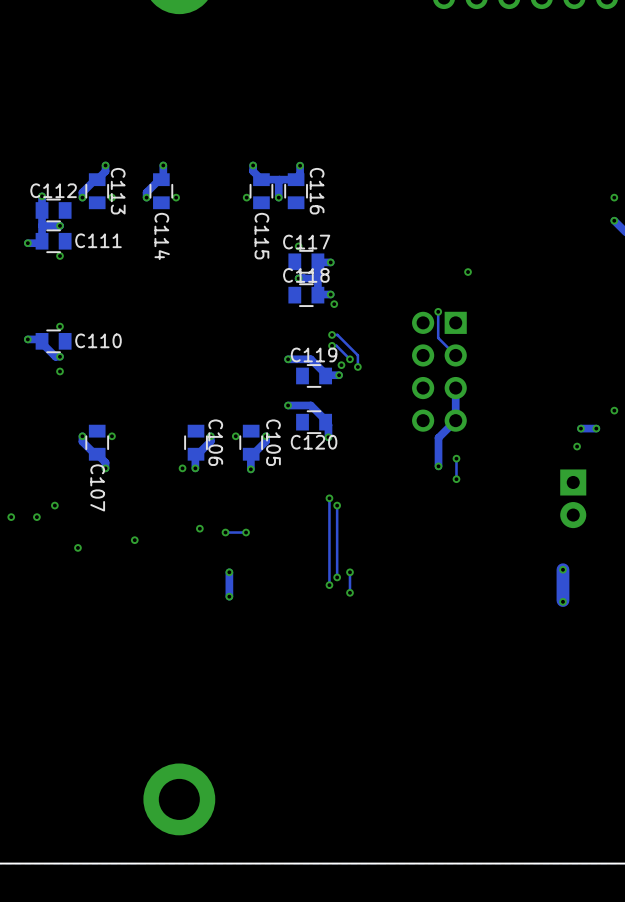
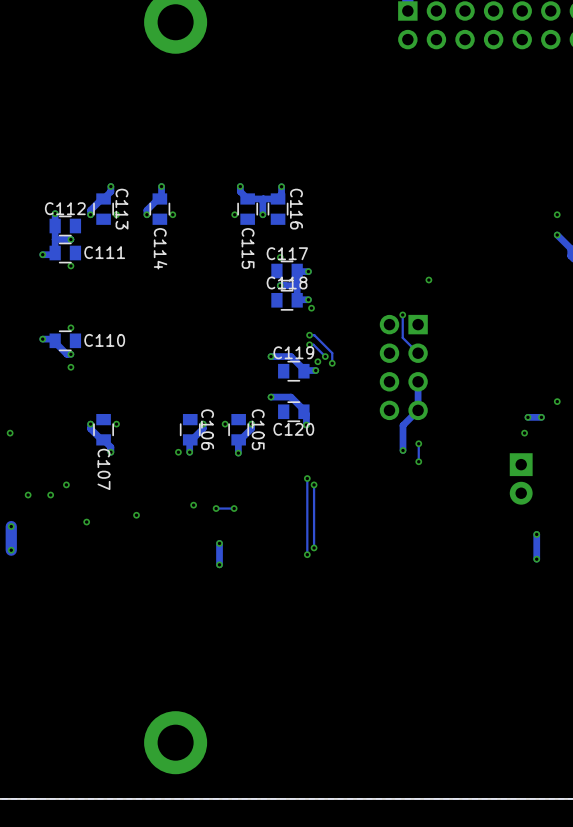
track: none -> (536, 534) (536, 559)
via: none -> (536, 534)
track: (562, 569) (562, 600) -> none
via: (562, 569) -> none
track: (349, 572) (349, 592) -> none
via: (349, 572) -> none
via: none -> (536, 559)
via: (349, 592) -> none
via: (562, 601) -> none

